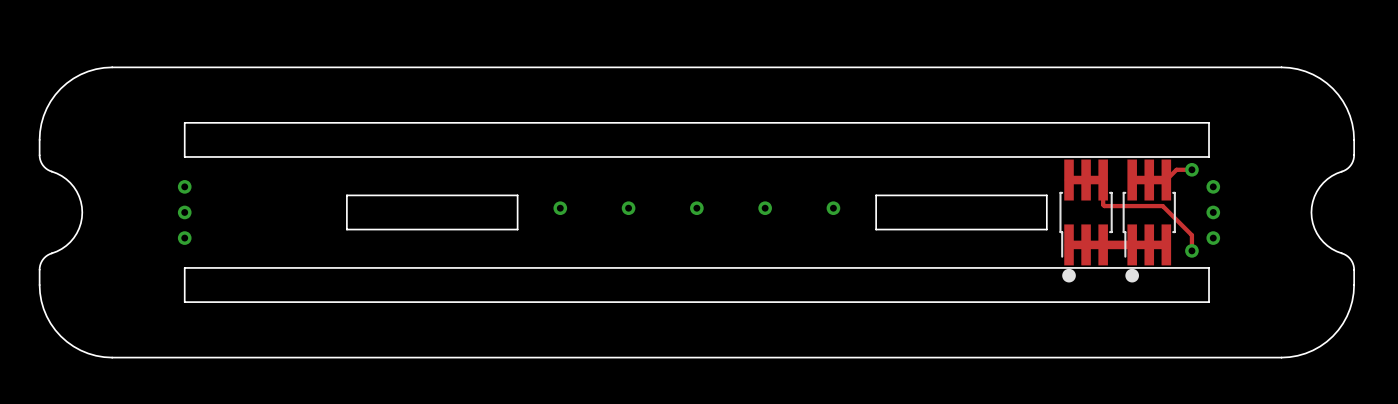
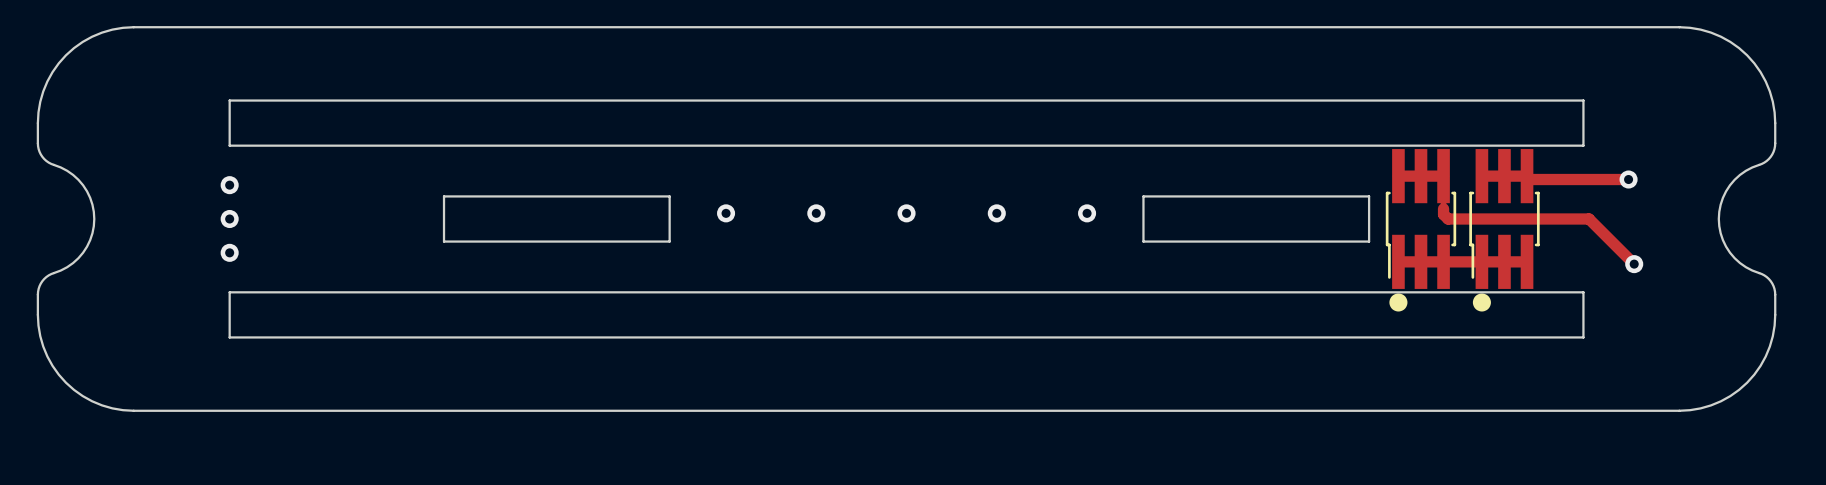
track: (1191, 169) (1176, 169) (1166, 180) -> (1628, 179) (1530, 179) (1527, 176)
via: (1191, 169) -> none
via: none -> (1628, 179)
via: (1213, 186) -> none
track: (1103, 204) (1162, 206) (1191, 235) (1191, 250) -> (1443, 208) (1443, 214) (1448, 218) (1589, 218) (1634, 264)
via: (1213, 212) -> none
via: (1213, 238) -> none
via: none -> (1634, 264)
via: (1191, 250) -> none

